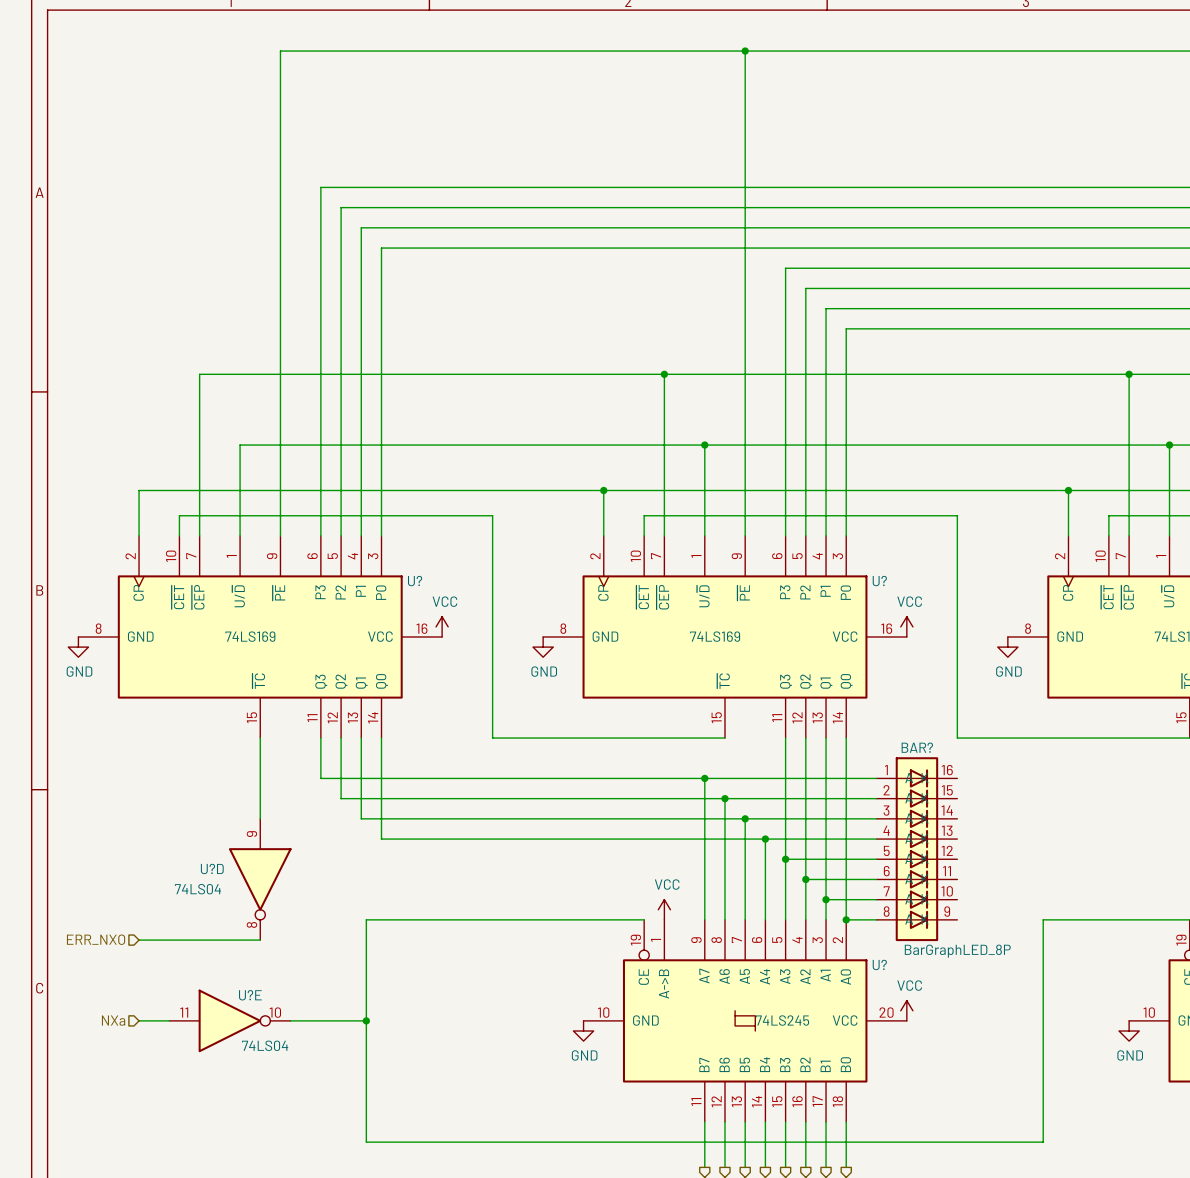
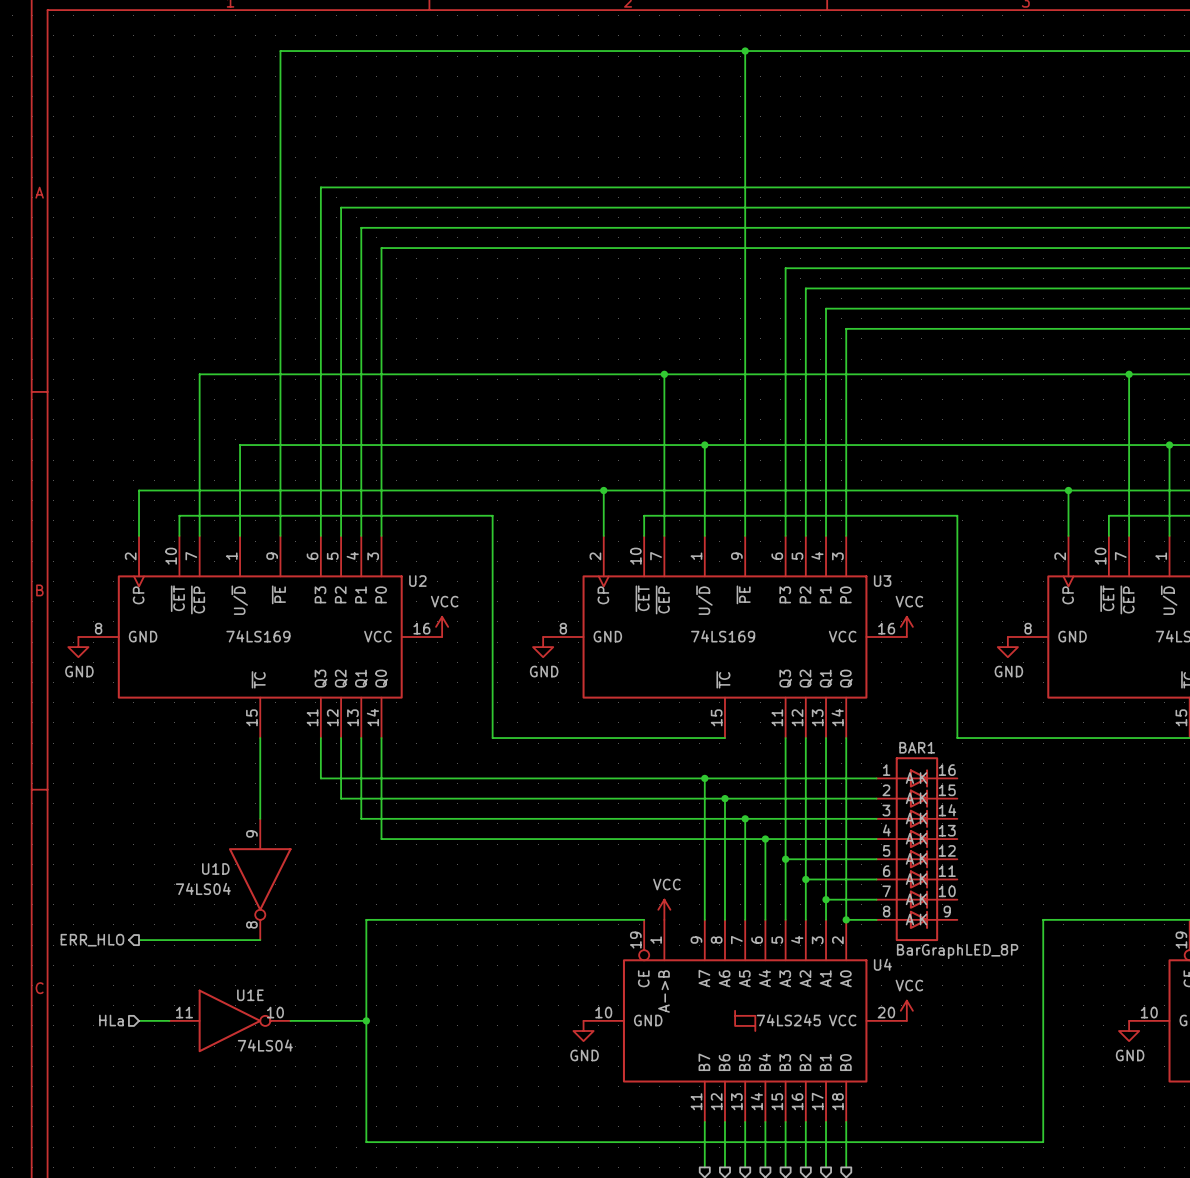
U? name: U? (415, 581) -> U2 (417, 581)
U? name: U? (879, 581) -> U3 (882, 581)
BAR? name: BAR? (917, 747) -> BAR1 (917, 747)
U?D name: U?D (212, 868) -> U1D (215, 868)
hierarchical label shape: input (96, 939) -> output (92, 940)
hierarchical label: ERR_NXO (96, 939) -> ERR_HLO (92, 940)
U? name: U? (879, 964) -> U4 (882, 964)
U?E name: U?E (250, 995) -> U1E (250, 995)
hierarchical label: NXa (113, 1020) -> HLa (111, 1020)

